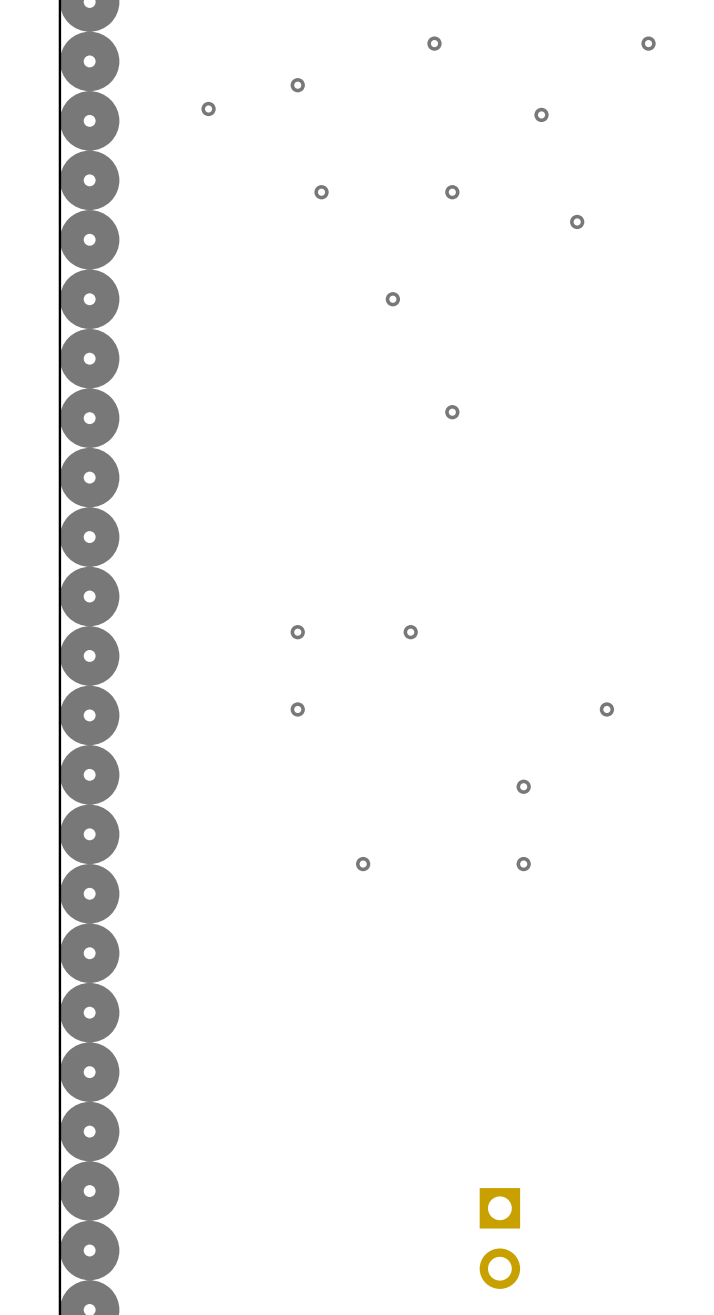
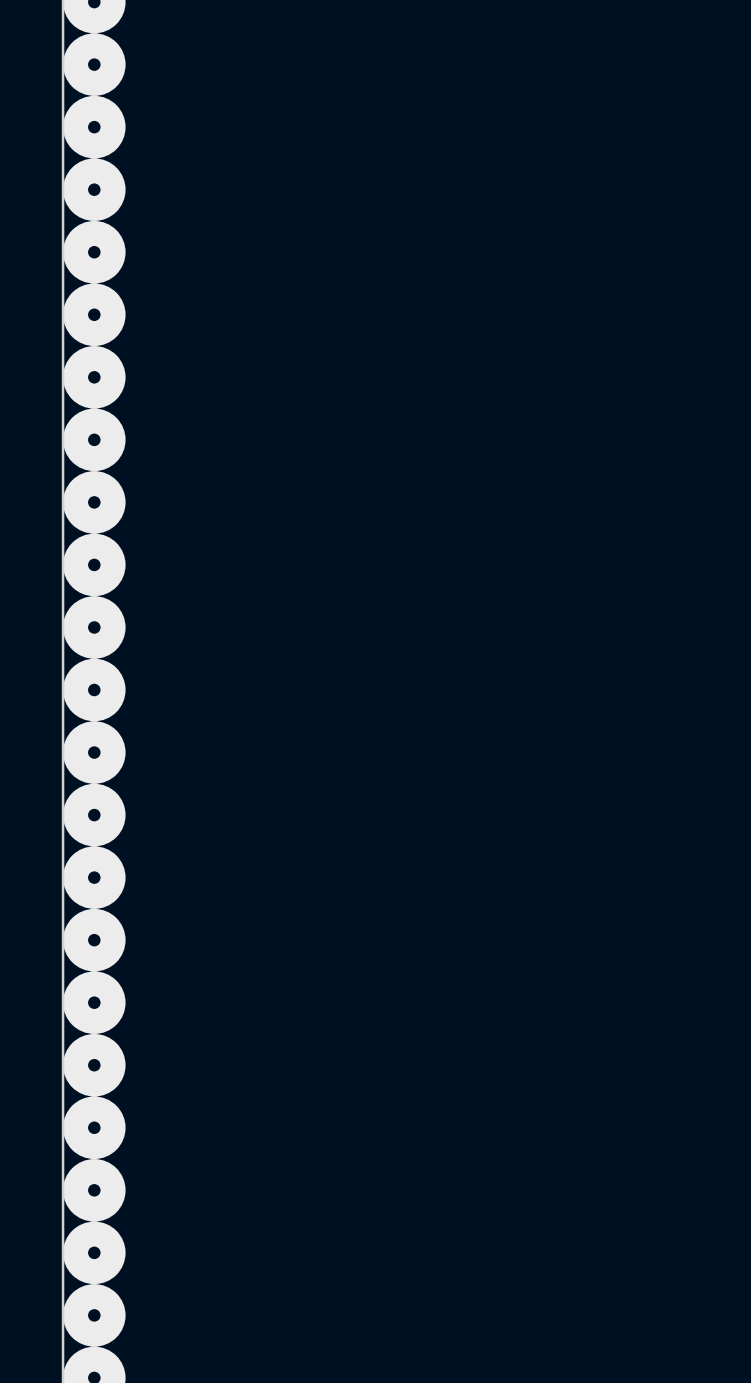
via: (434, 43) -> none
via: (648, 43) -> none
via: (297, 85) -> none
via: (208, 108) -> none
via: (541, 114) -> none
via: (321, 192) -> none
via: (452, 192) -> none
via: (577, 221) -> none
via: (392, 299) -> none
via: (452, 412) -> none
via: (297, 632) -> none
via: (410, 632) -> none
via: (297, 709) -> none
via: (606, 709) -> none
via: (523, 786) -> none
via: (363, 864) -> none
via: (523, 864) -> none
part: (499, 1238) -> none

